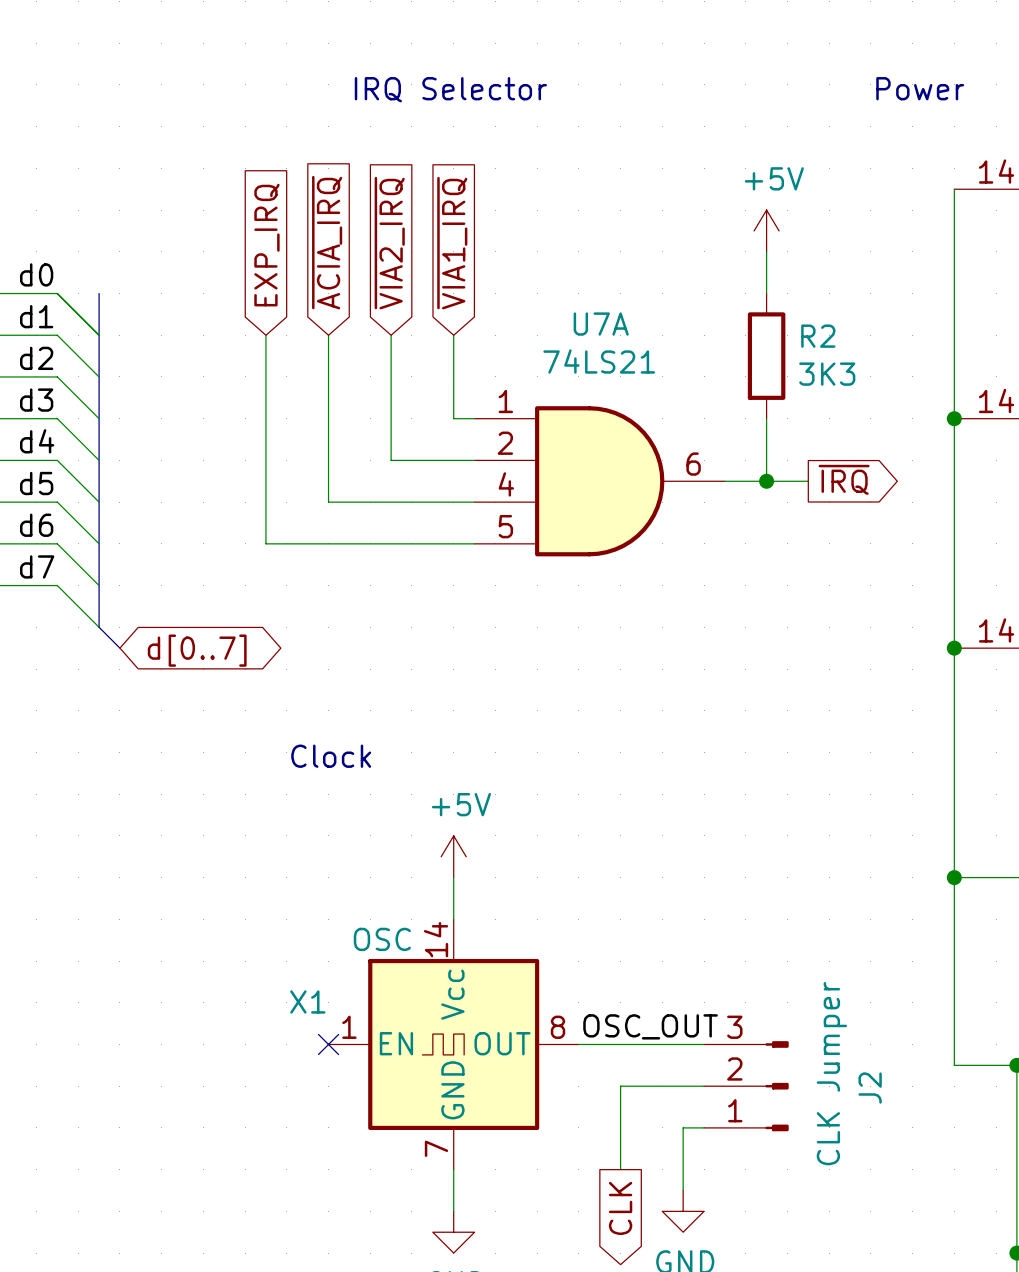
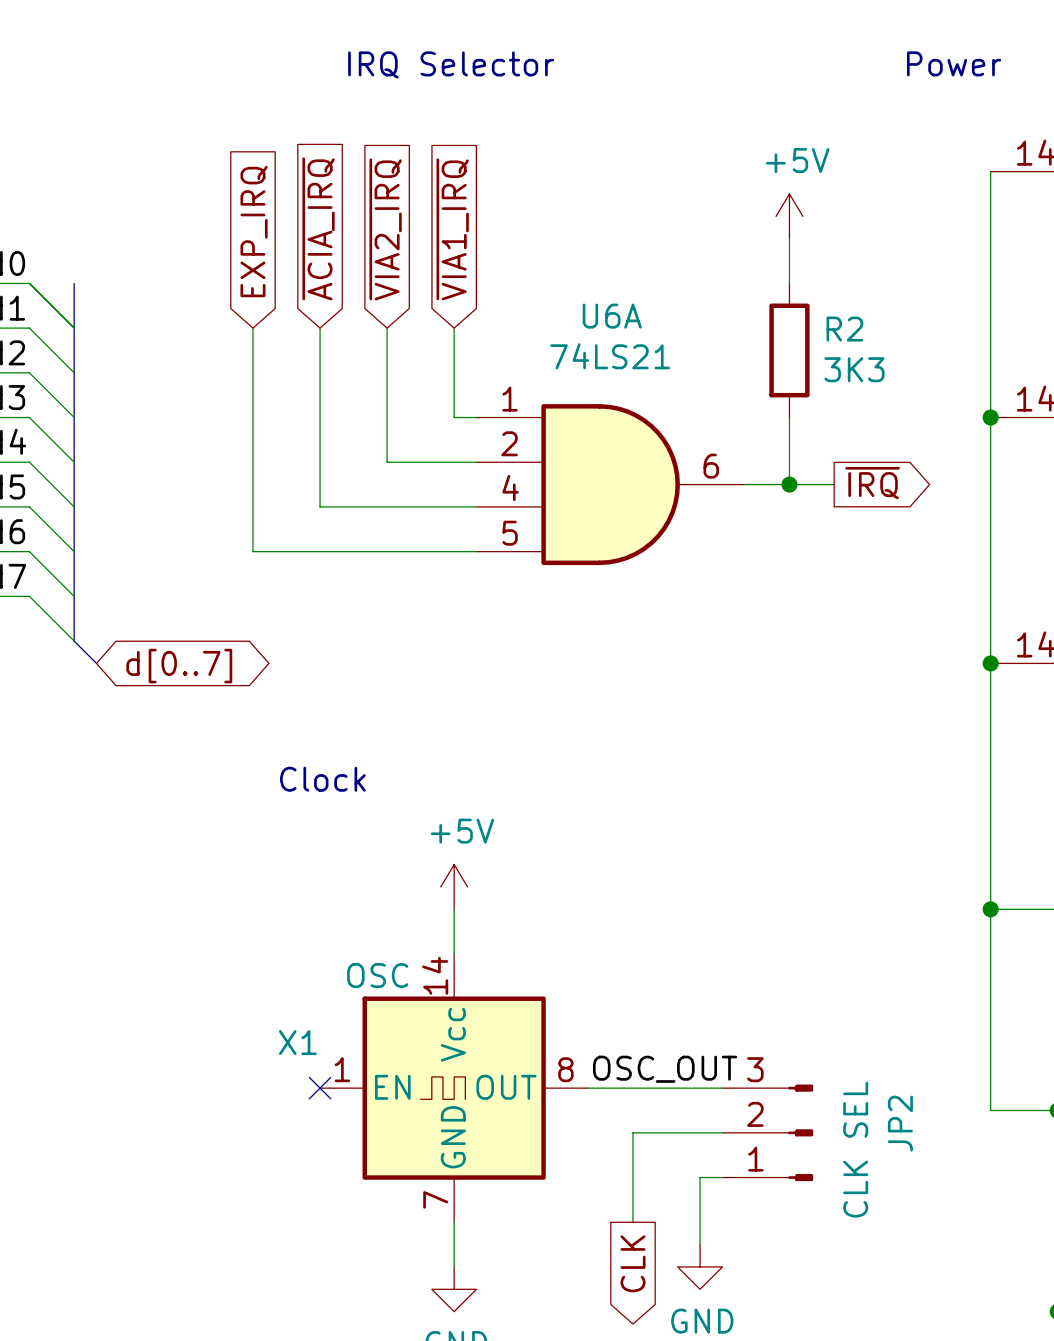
U7A name: U7A (601, 324) -> U6A (612, 316)
J2 value: CLK Jumper (831, 1073) -> CLK SEL (855, 1149)
J2 name: J2 (870, 1088) -> JP2 (900, 1123)

